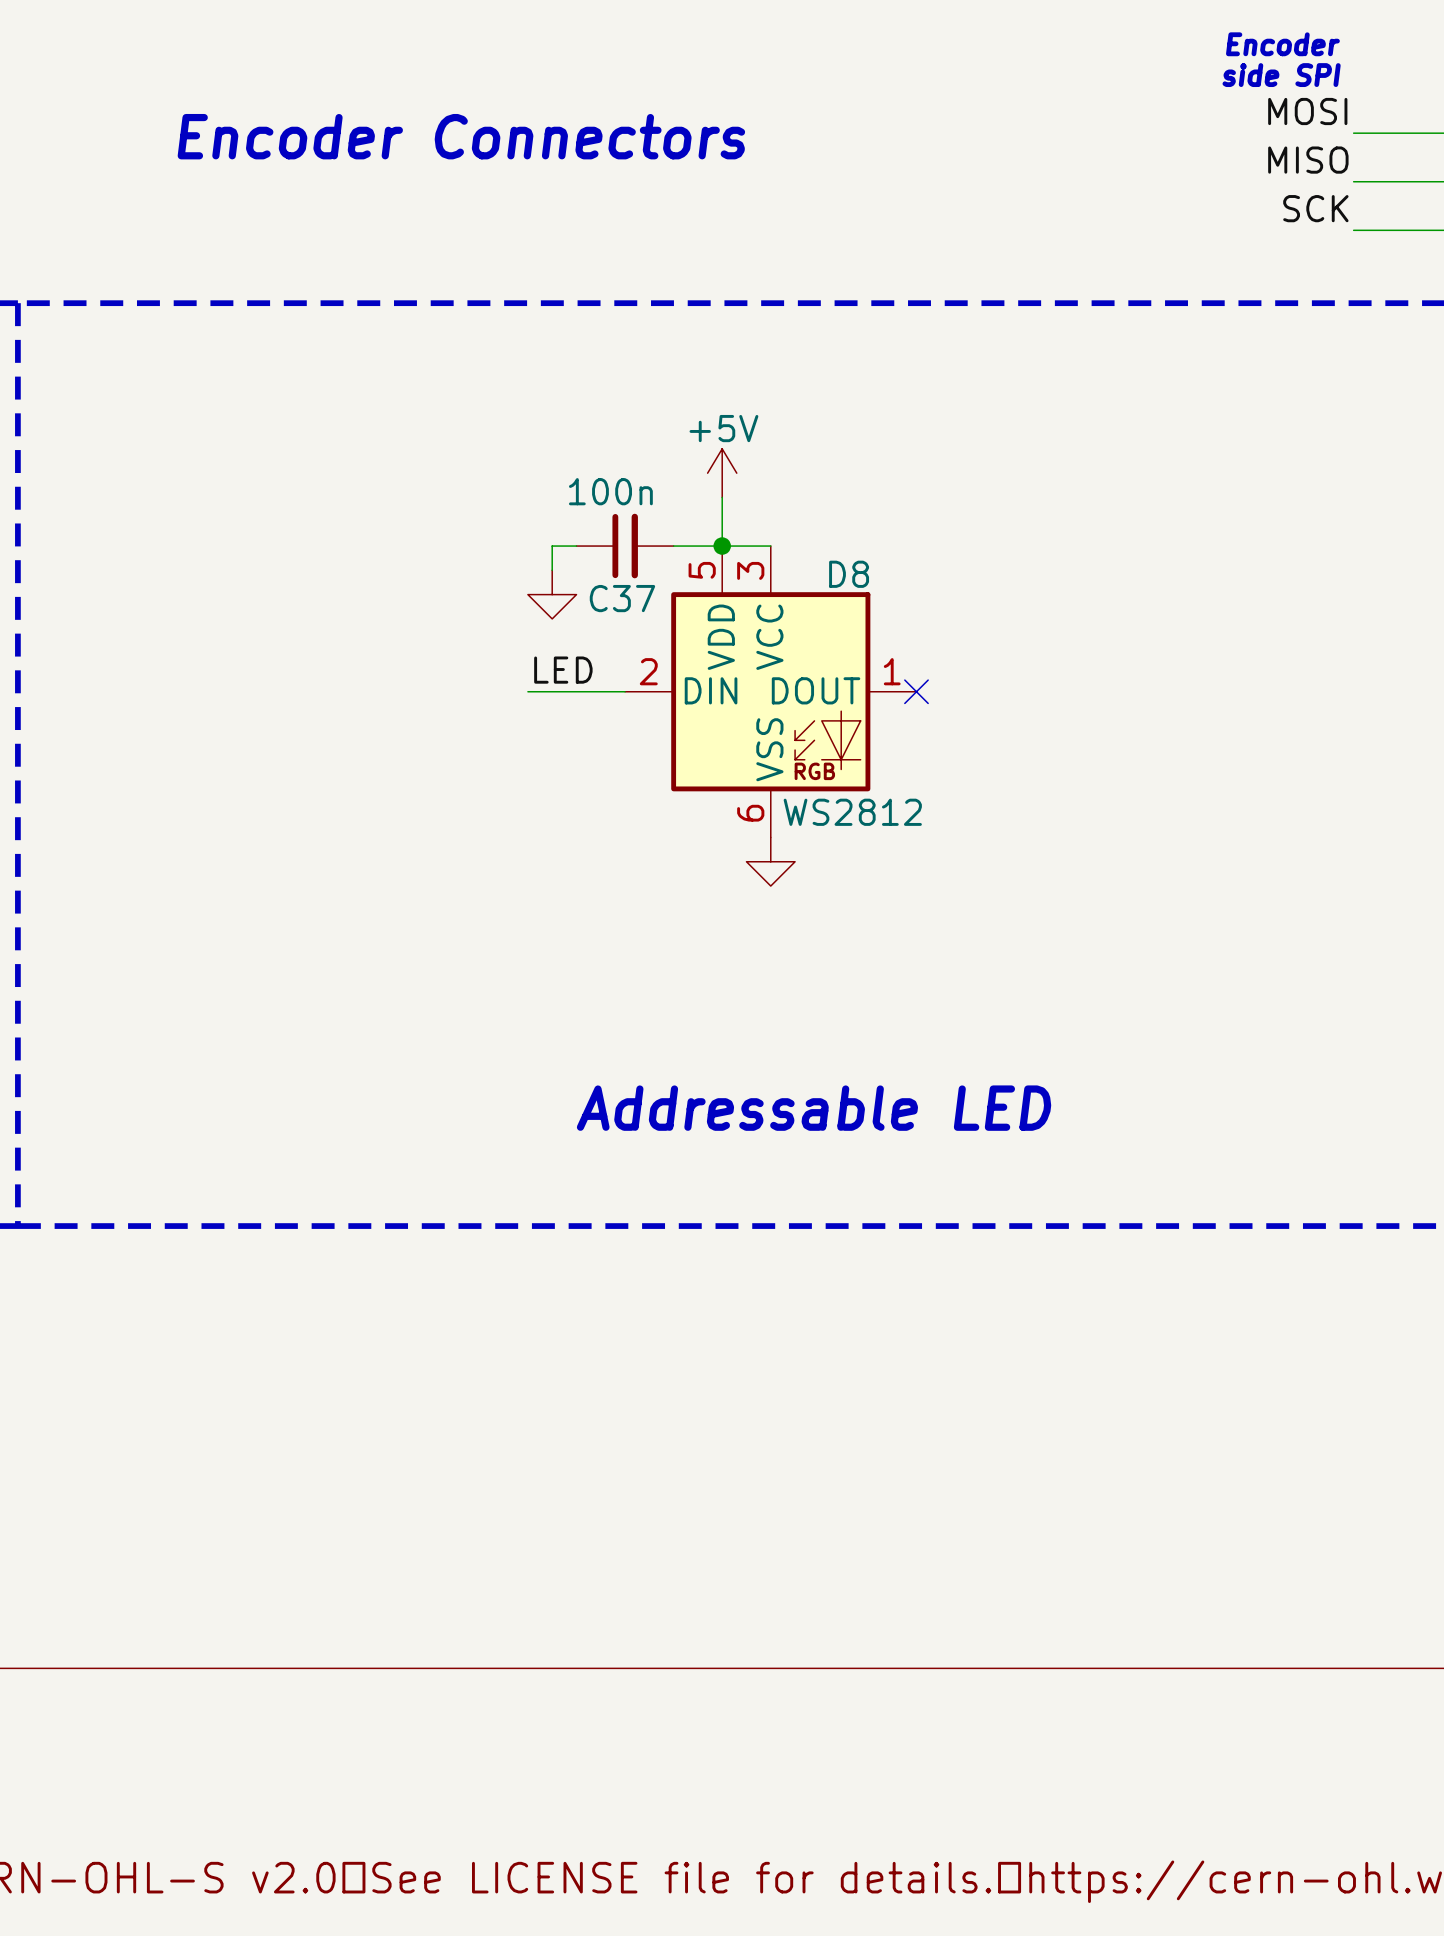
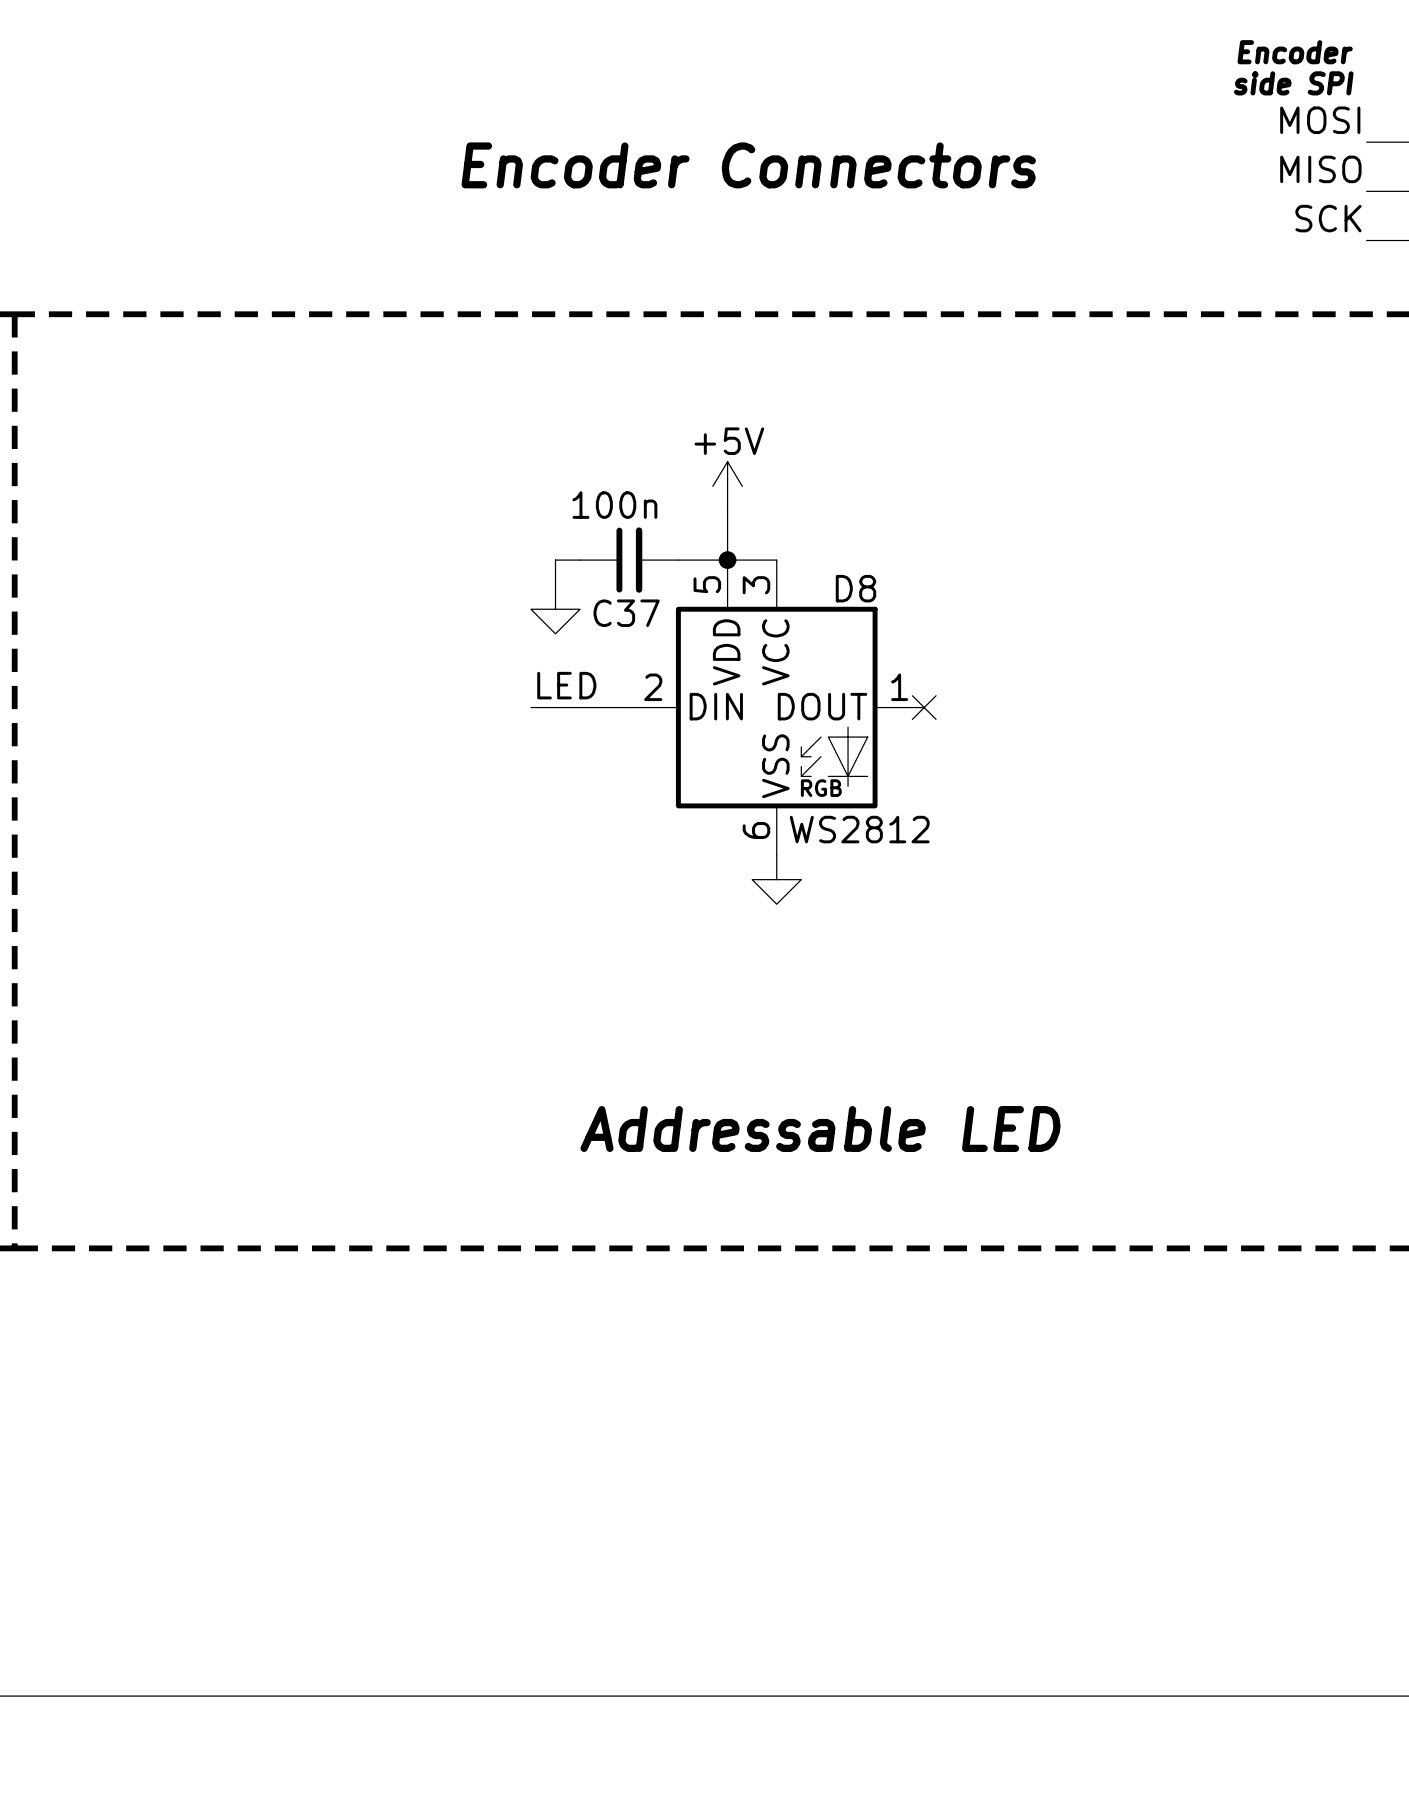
text position: Encoder Connectors (461, 136) -> Encoder Connectors (748, 165)

